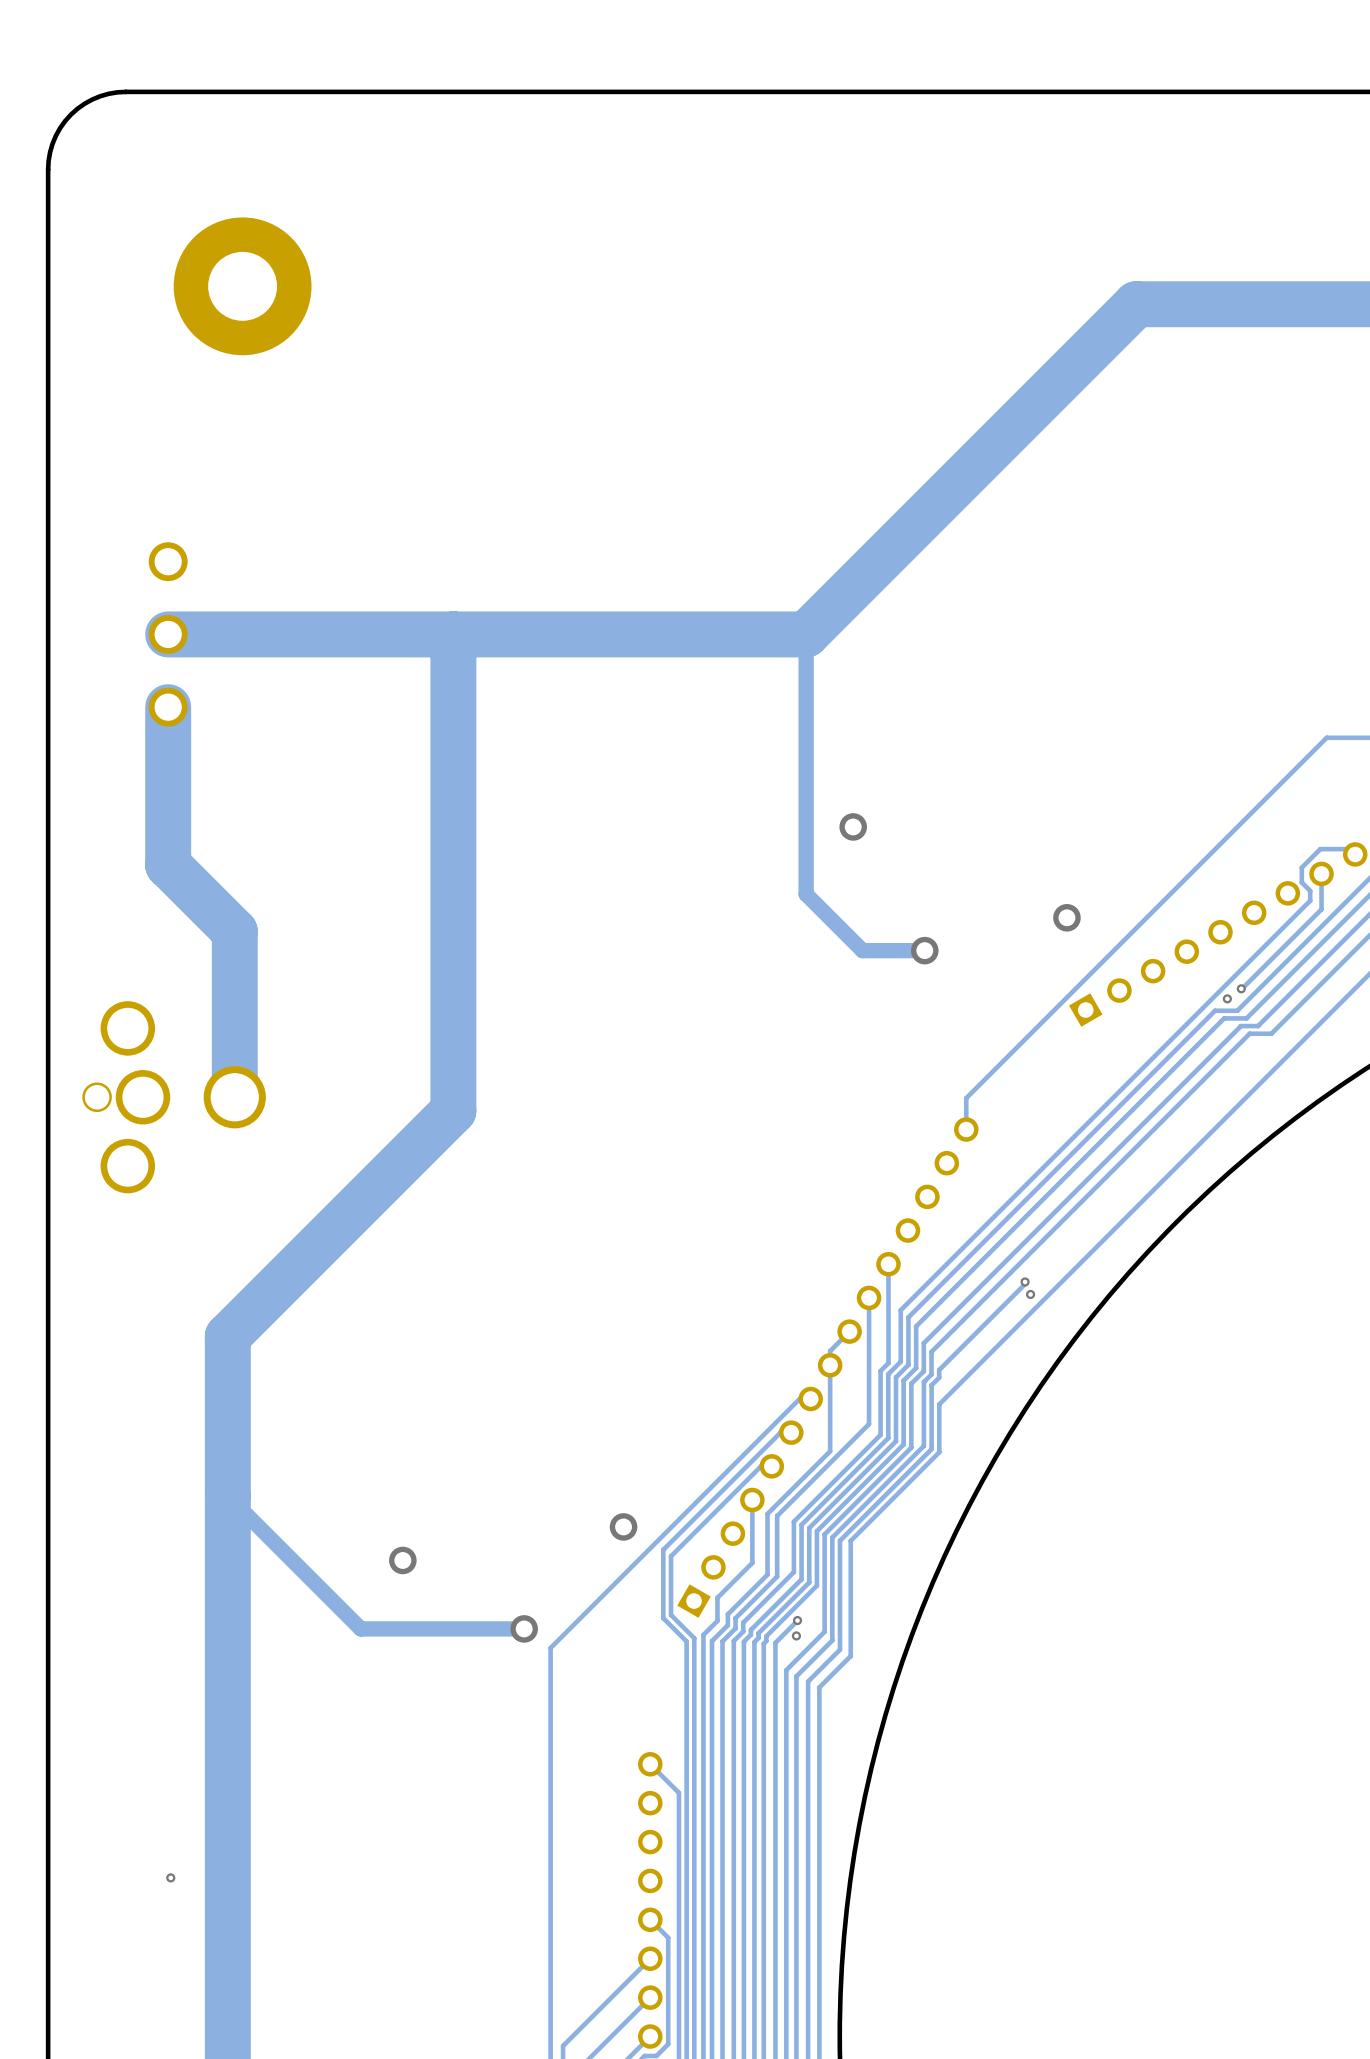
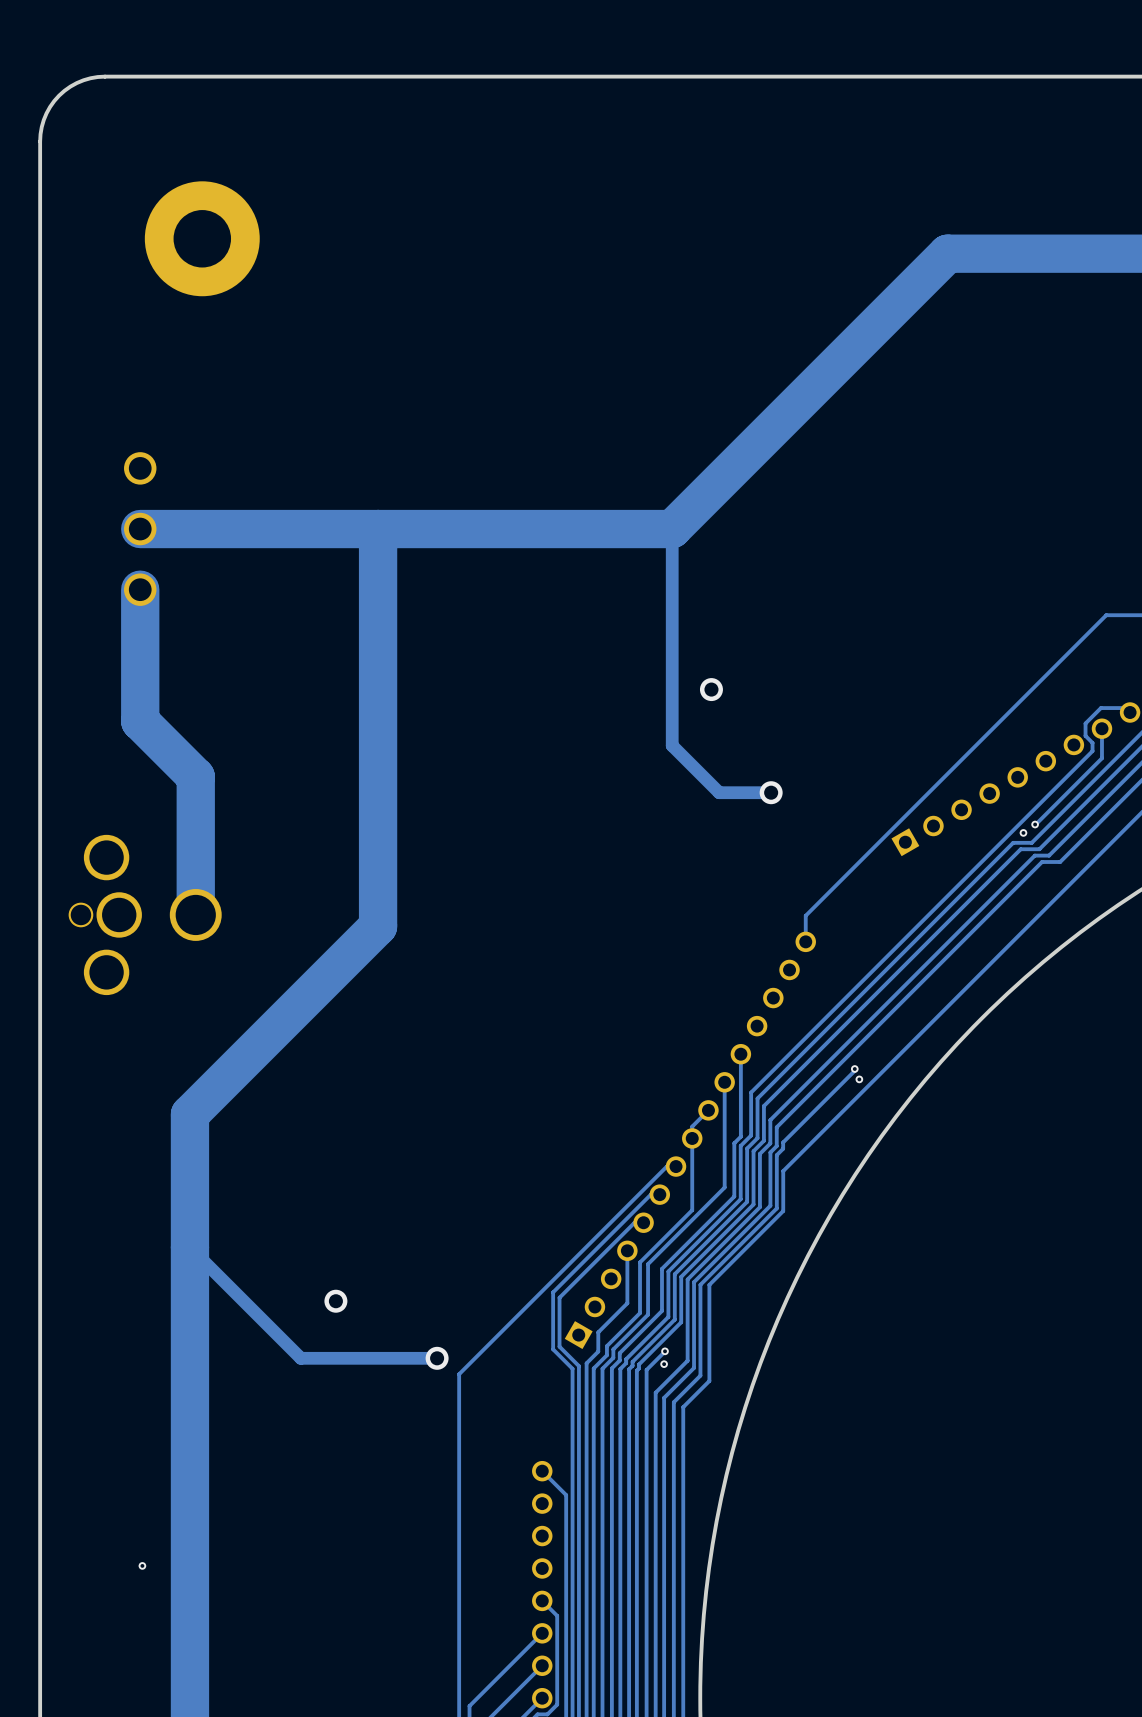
via: (1066, 917) -> none
via: (623, 1526) -> none

